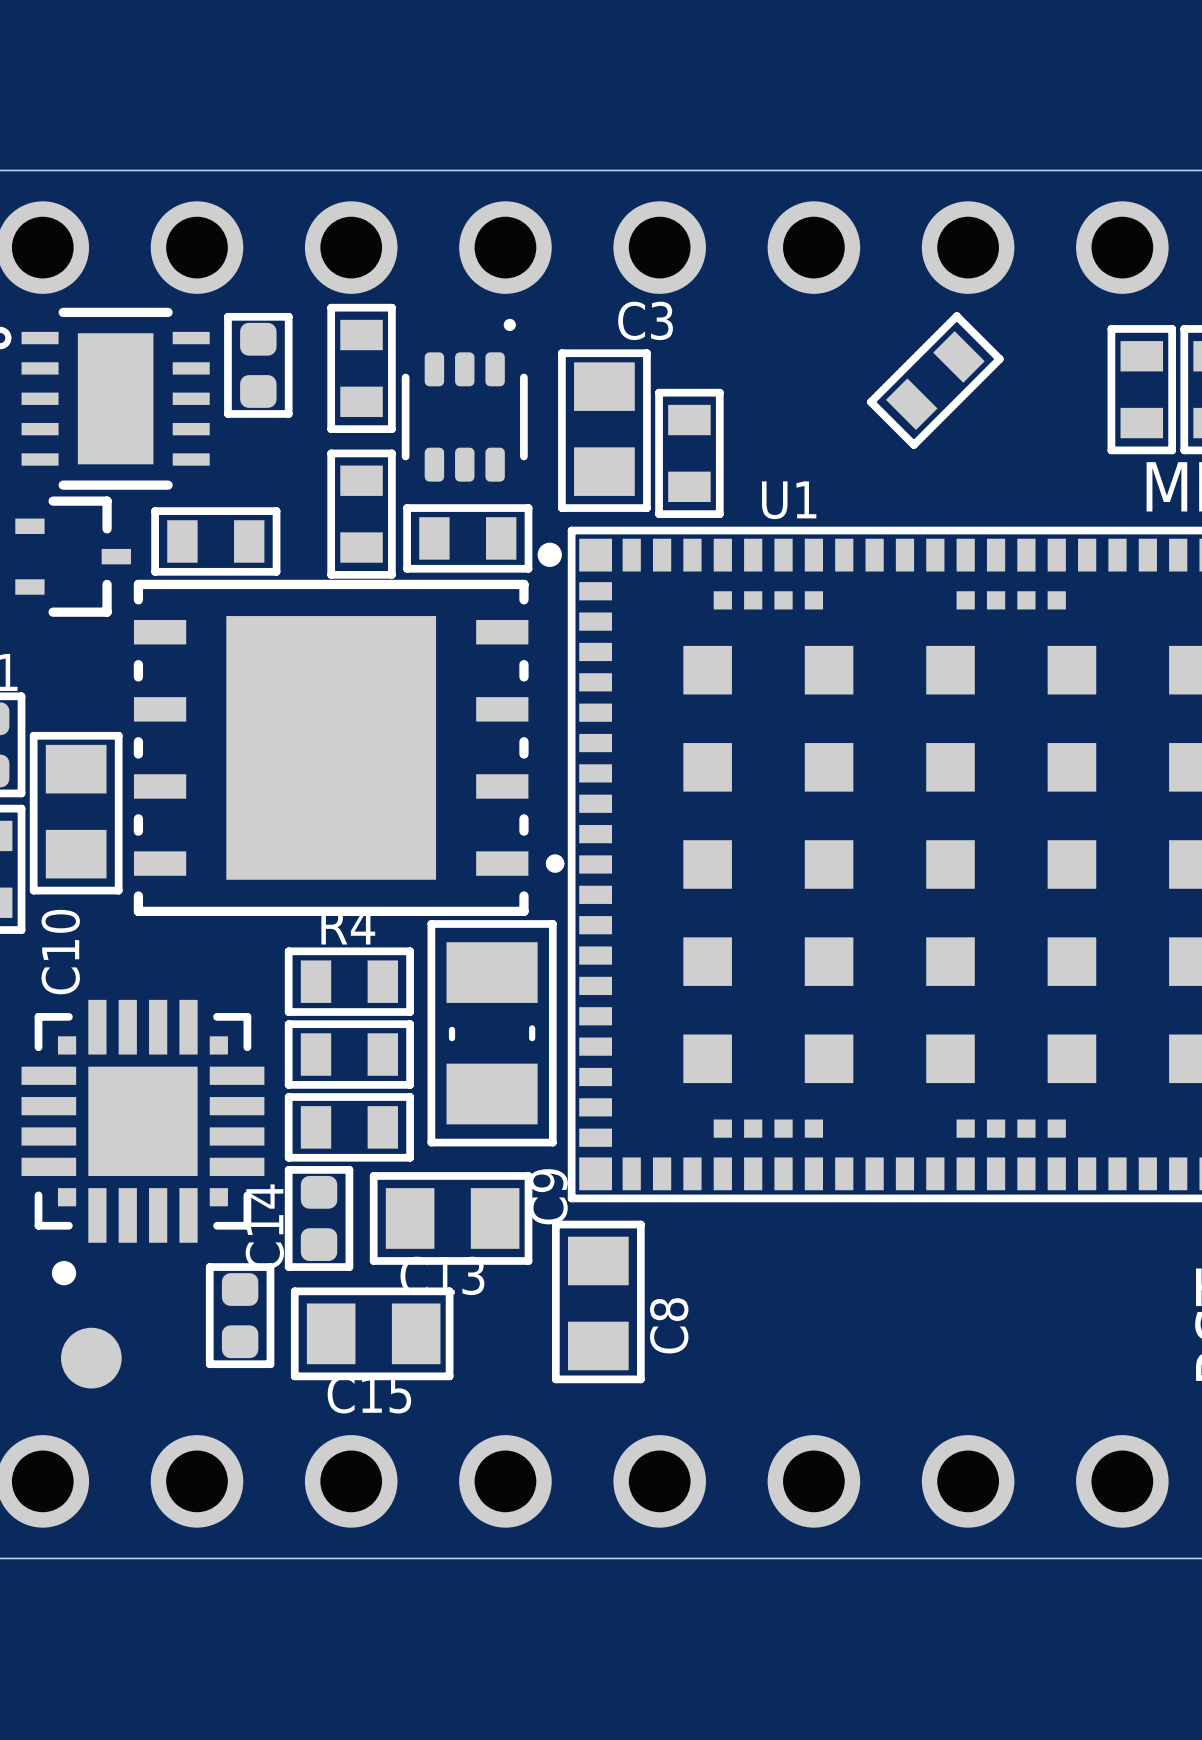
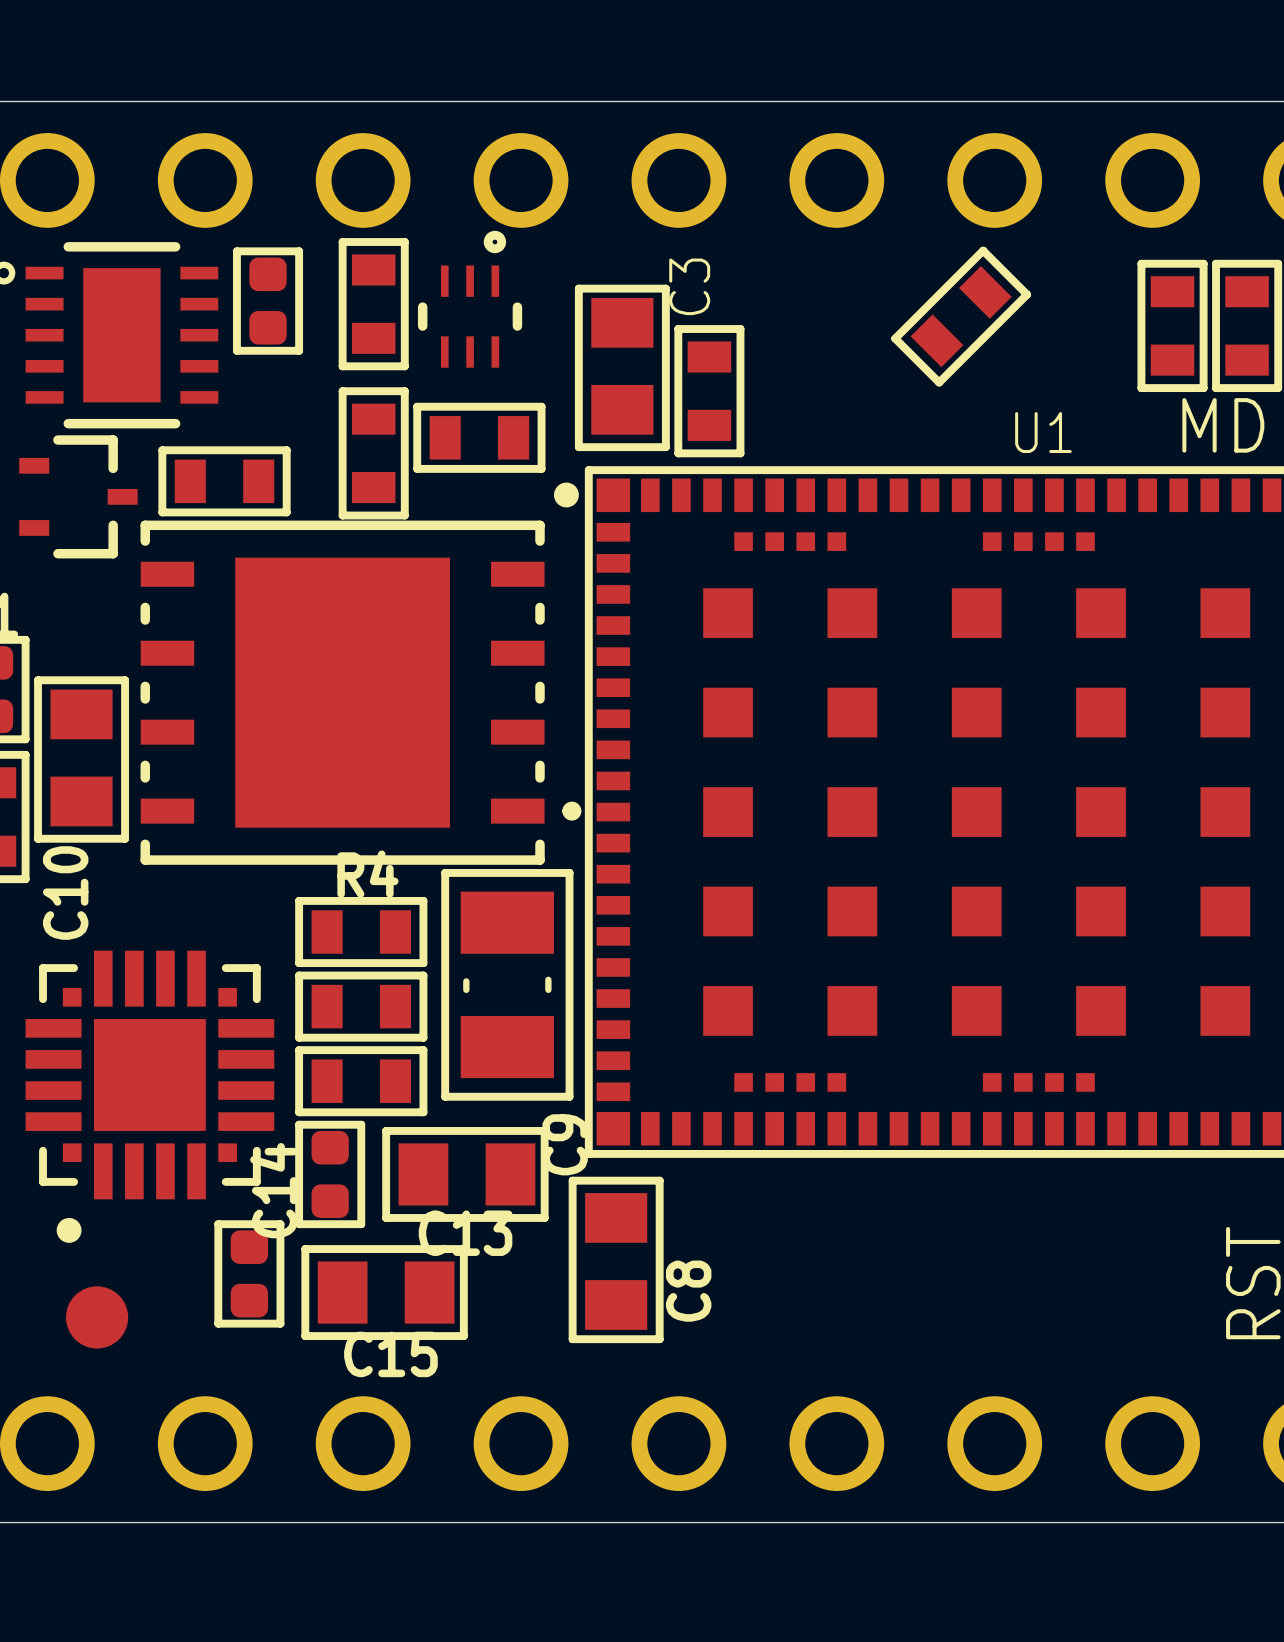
part footprint: [401, 318, 528, 482] -> [417, 230, 523, 368]
C3 name rotation: 0° (645, 320) -> 90° counterclockwise (689, 286)
U1 name position: U1 (789, 500) -> U1 (1043, 432)
part position: (467, 538) -> (479, 437)

